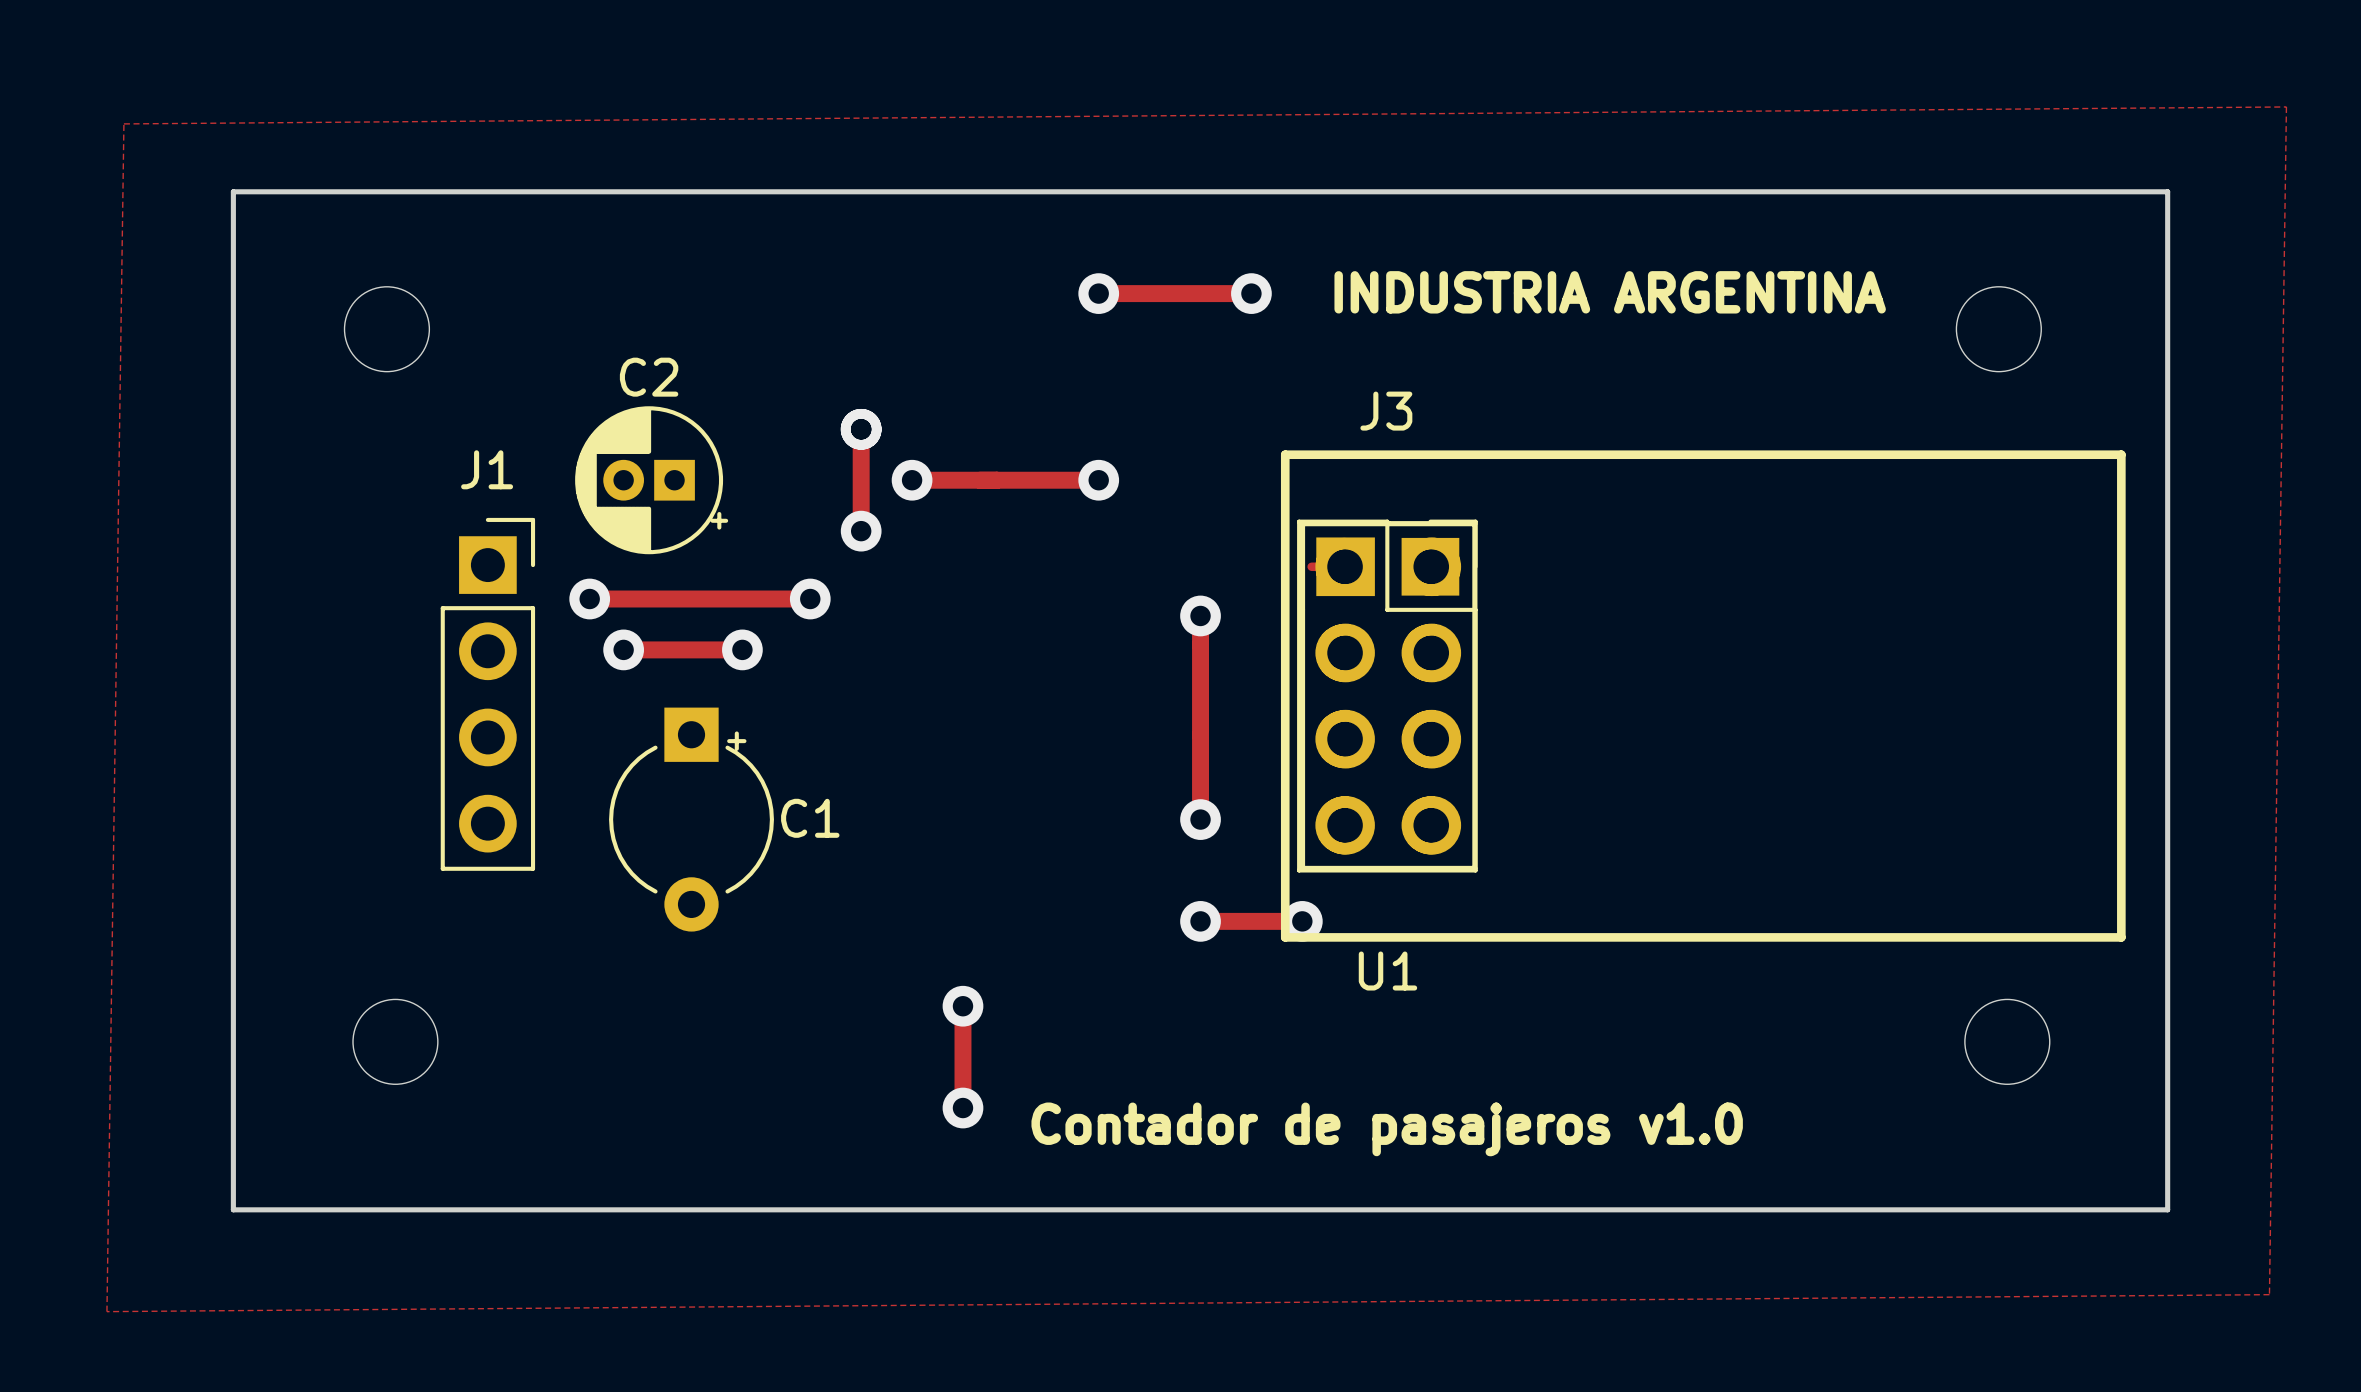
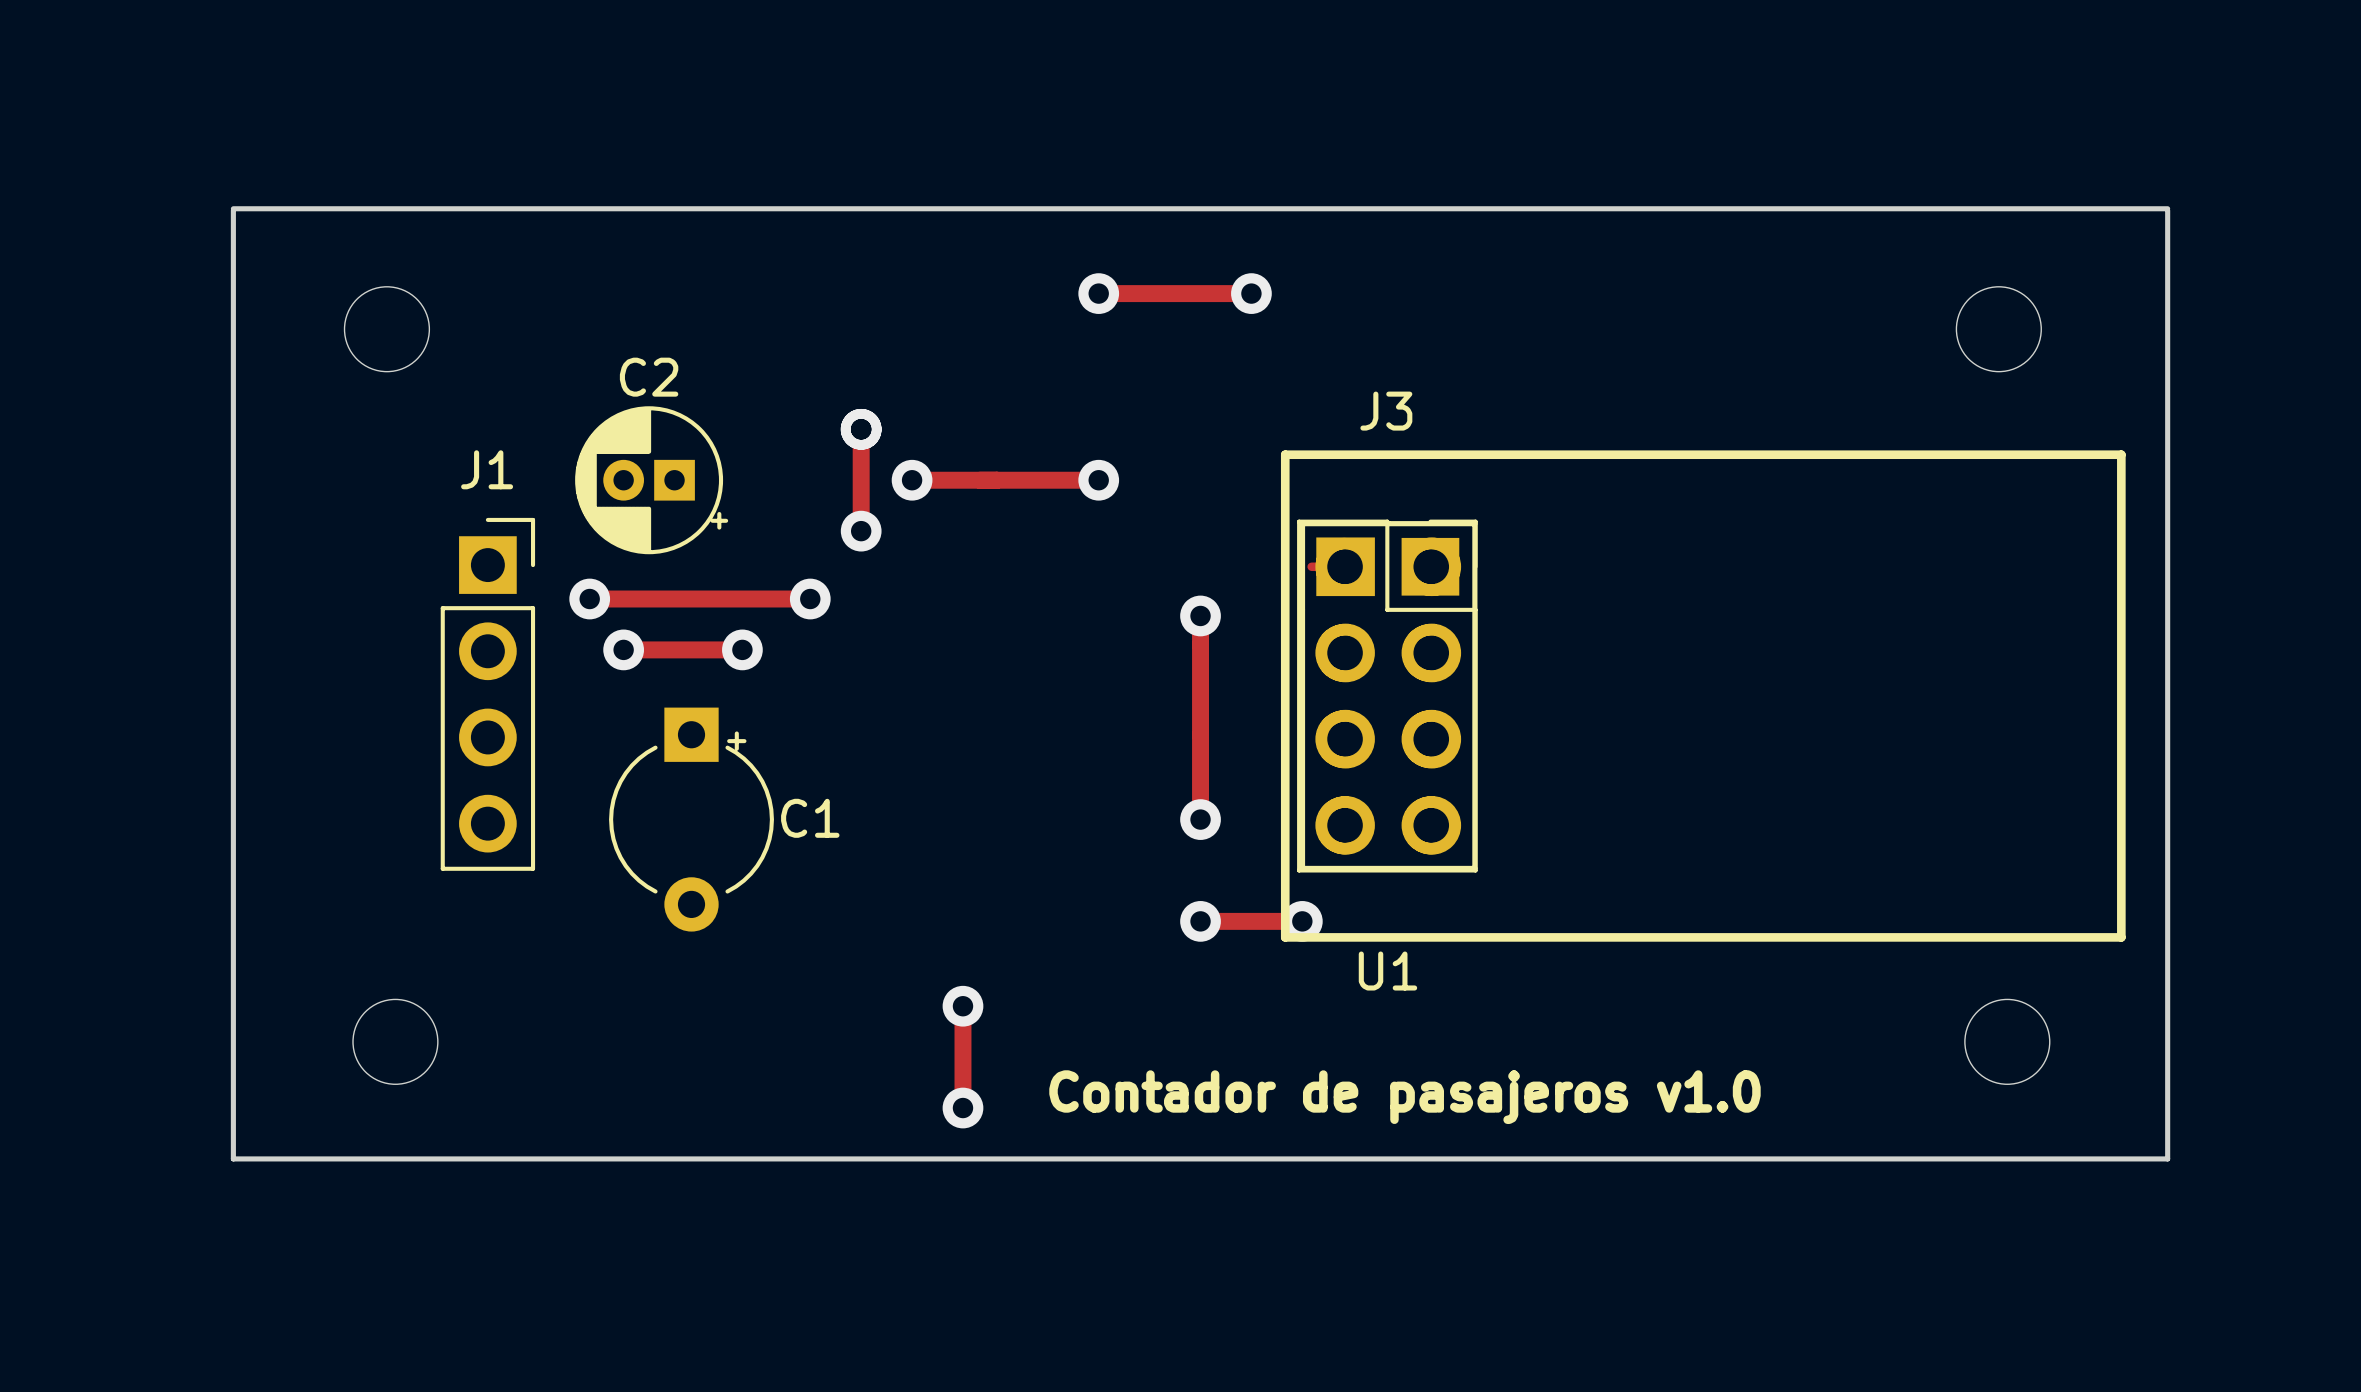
zone outline: (2286, 106) (123, 123) (106, 1311) (2269, 1294) (2286, 106) -> none
board edge: none -> (233, 208) (2167, 208)
board edge: (233, 210) (233, 191) (2167, 191) (2167, 210) -> none
text: INDUSTRIA ARGENTINA (1610, 292) -> none
text position: Contador de pasajeros v1.0 (1387, 1129) -> Contador de pasajeros v1.0 (1404, 1097)
board edge: (233, 1158) (233, 1209) (2167, 1209) (2167, 1158) -> (233, 1158) (2167, 1158)

